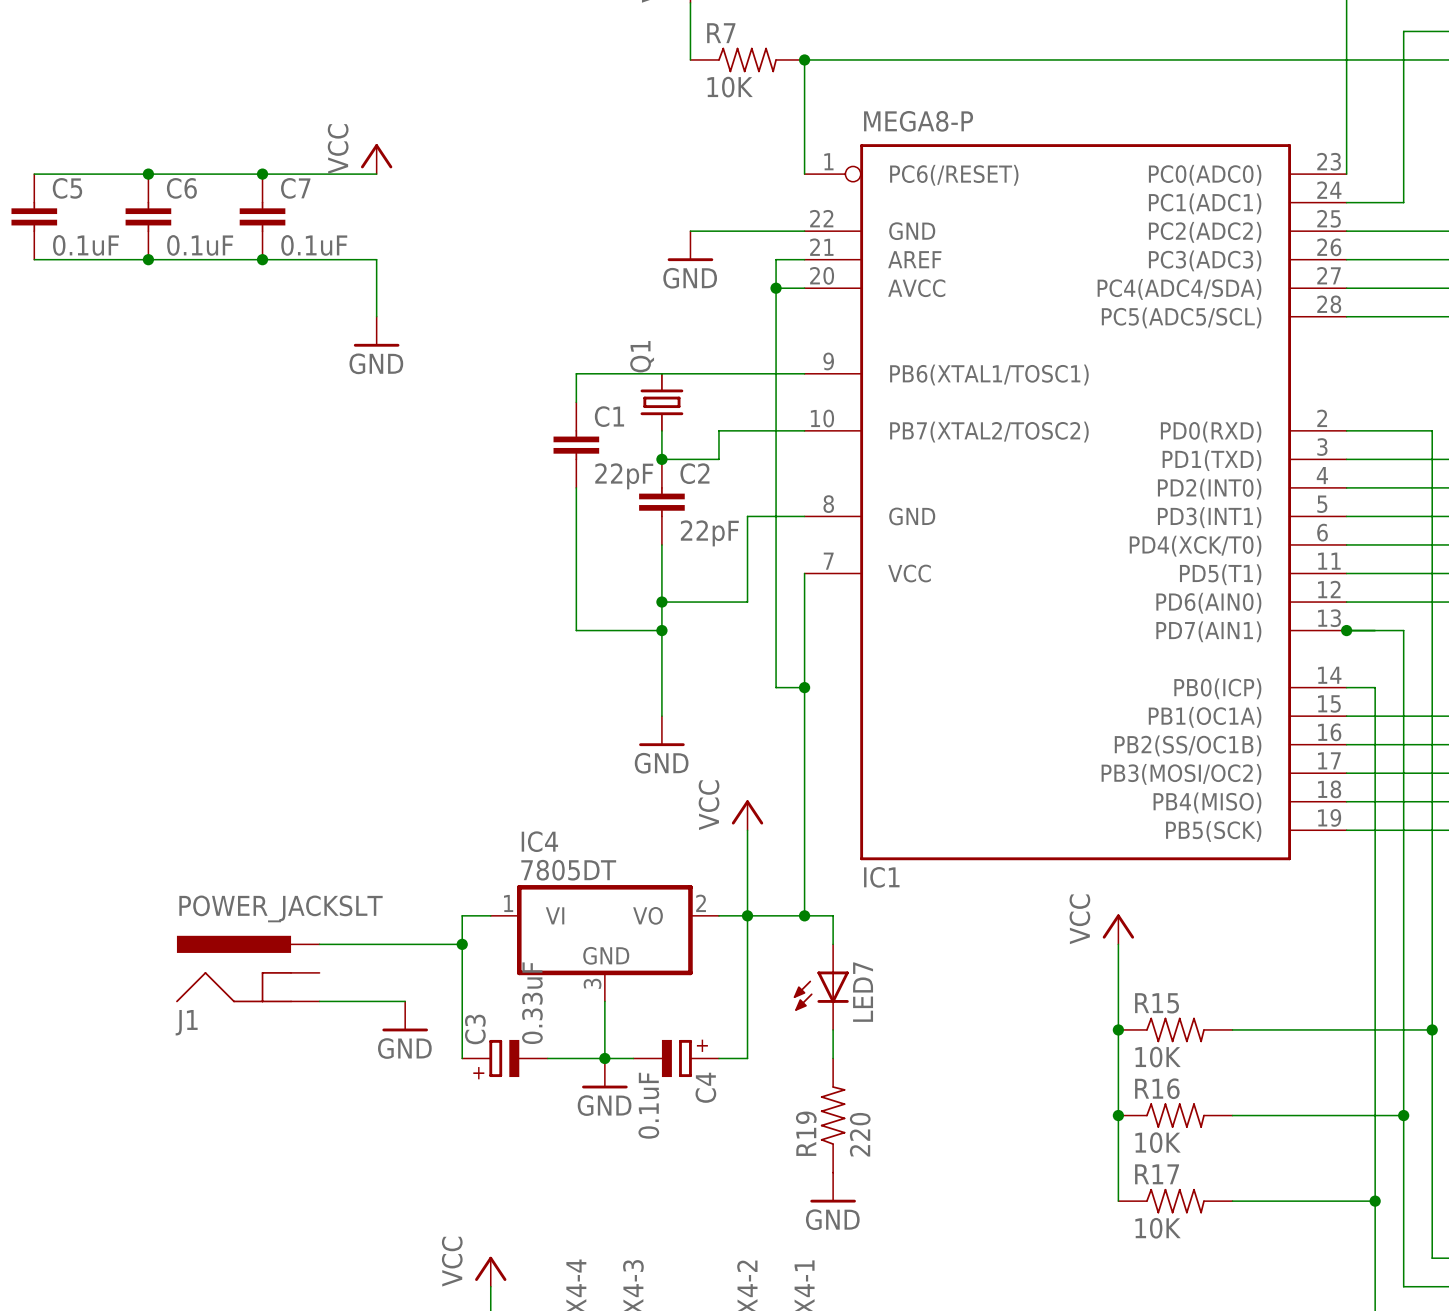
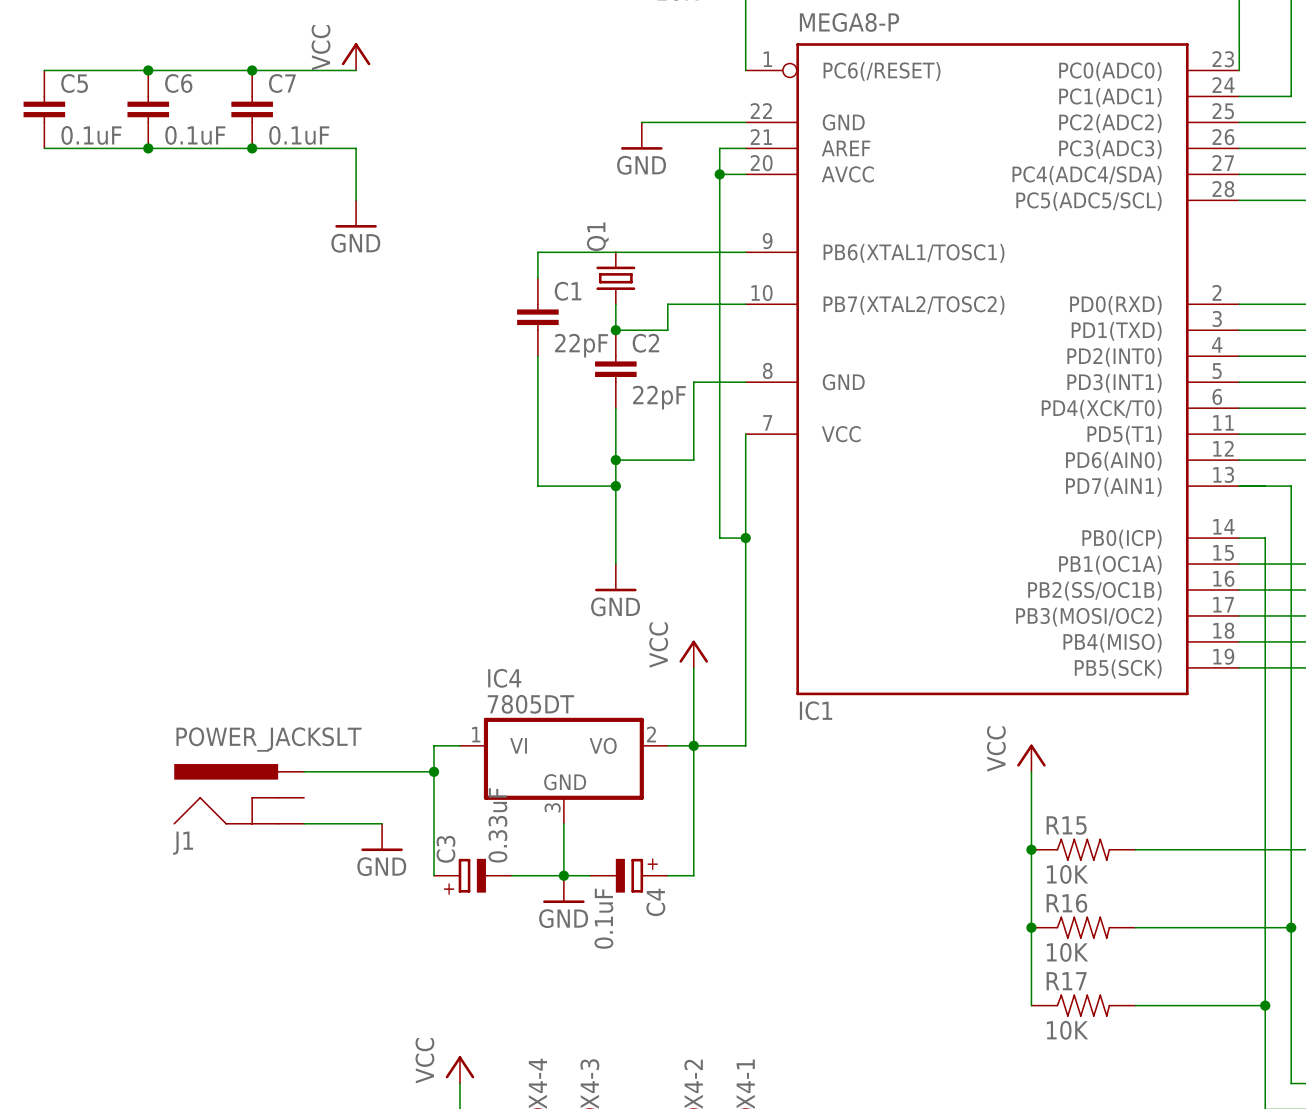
junction: (1346, 630) -> none
wire: (804, 915) (833, 915) (833, 944) -> none
junction: (804, 915) -> none
LED7: (821, 987) -> none
wire: (833, 1029) (833, 1058) -> none
R19: 220 (833, 1115) -> none
power symbol: GND (833, 1187) -> none

